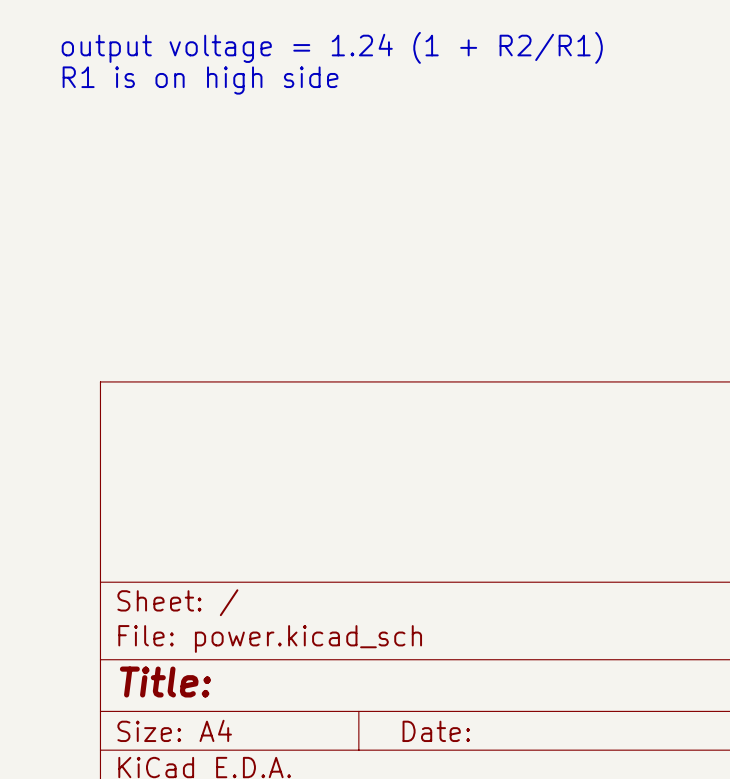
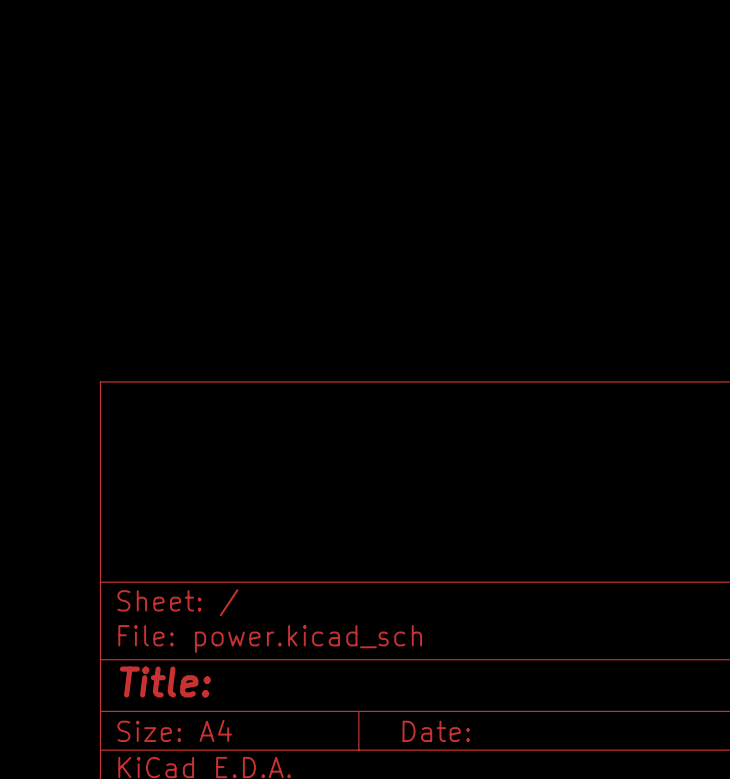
text: output voltage = 1.24 (1 + R2/R1) (332, 47) -> none
text: R1 is on high side (200, 80) -> none

